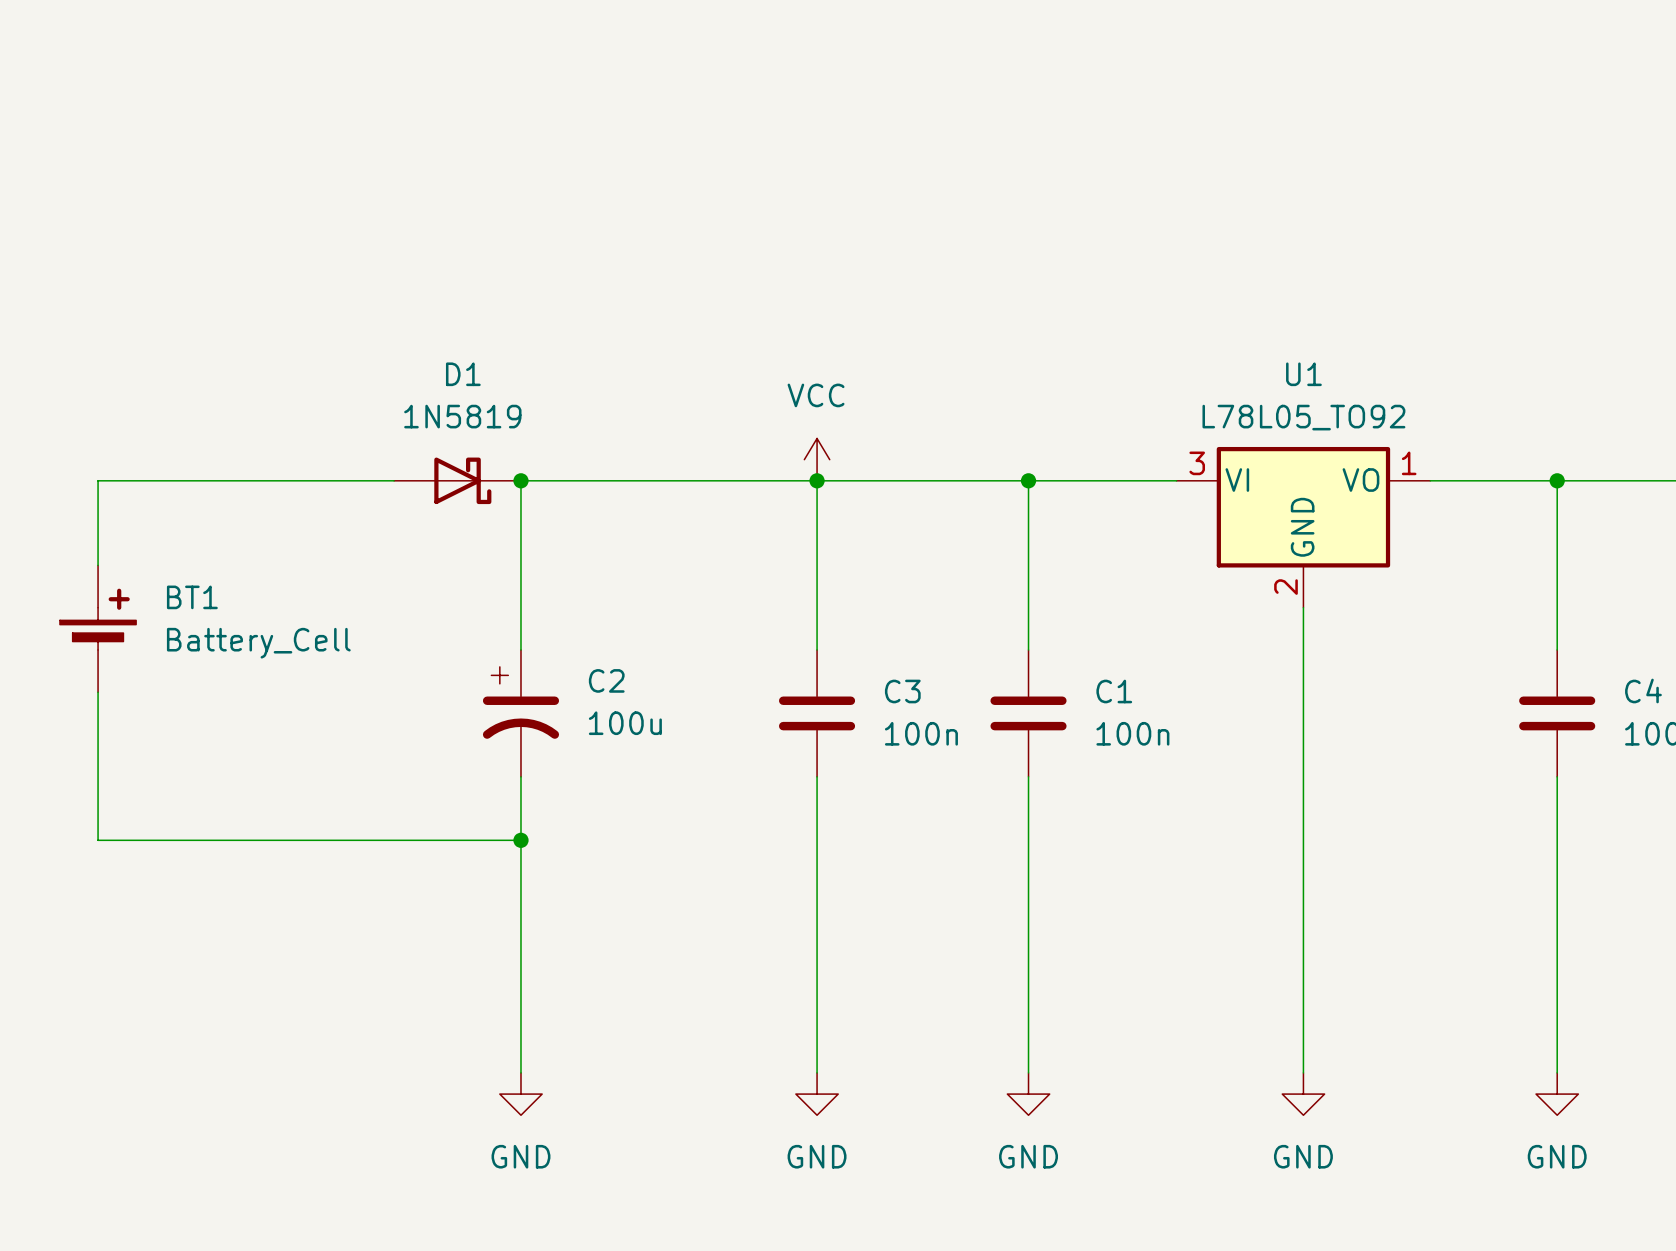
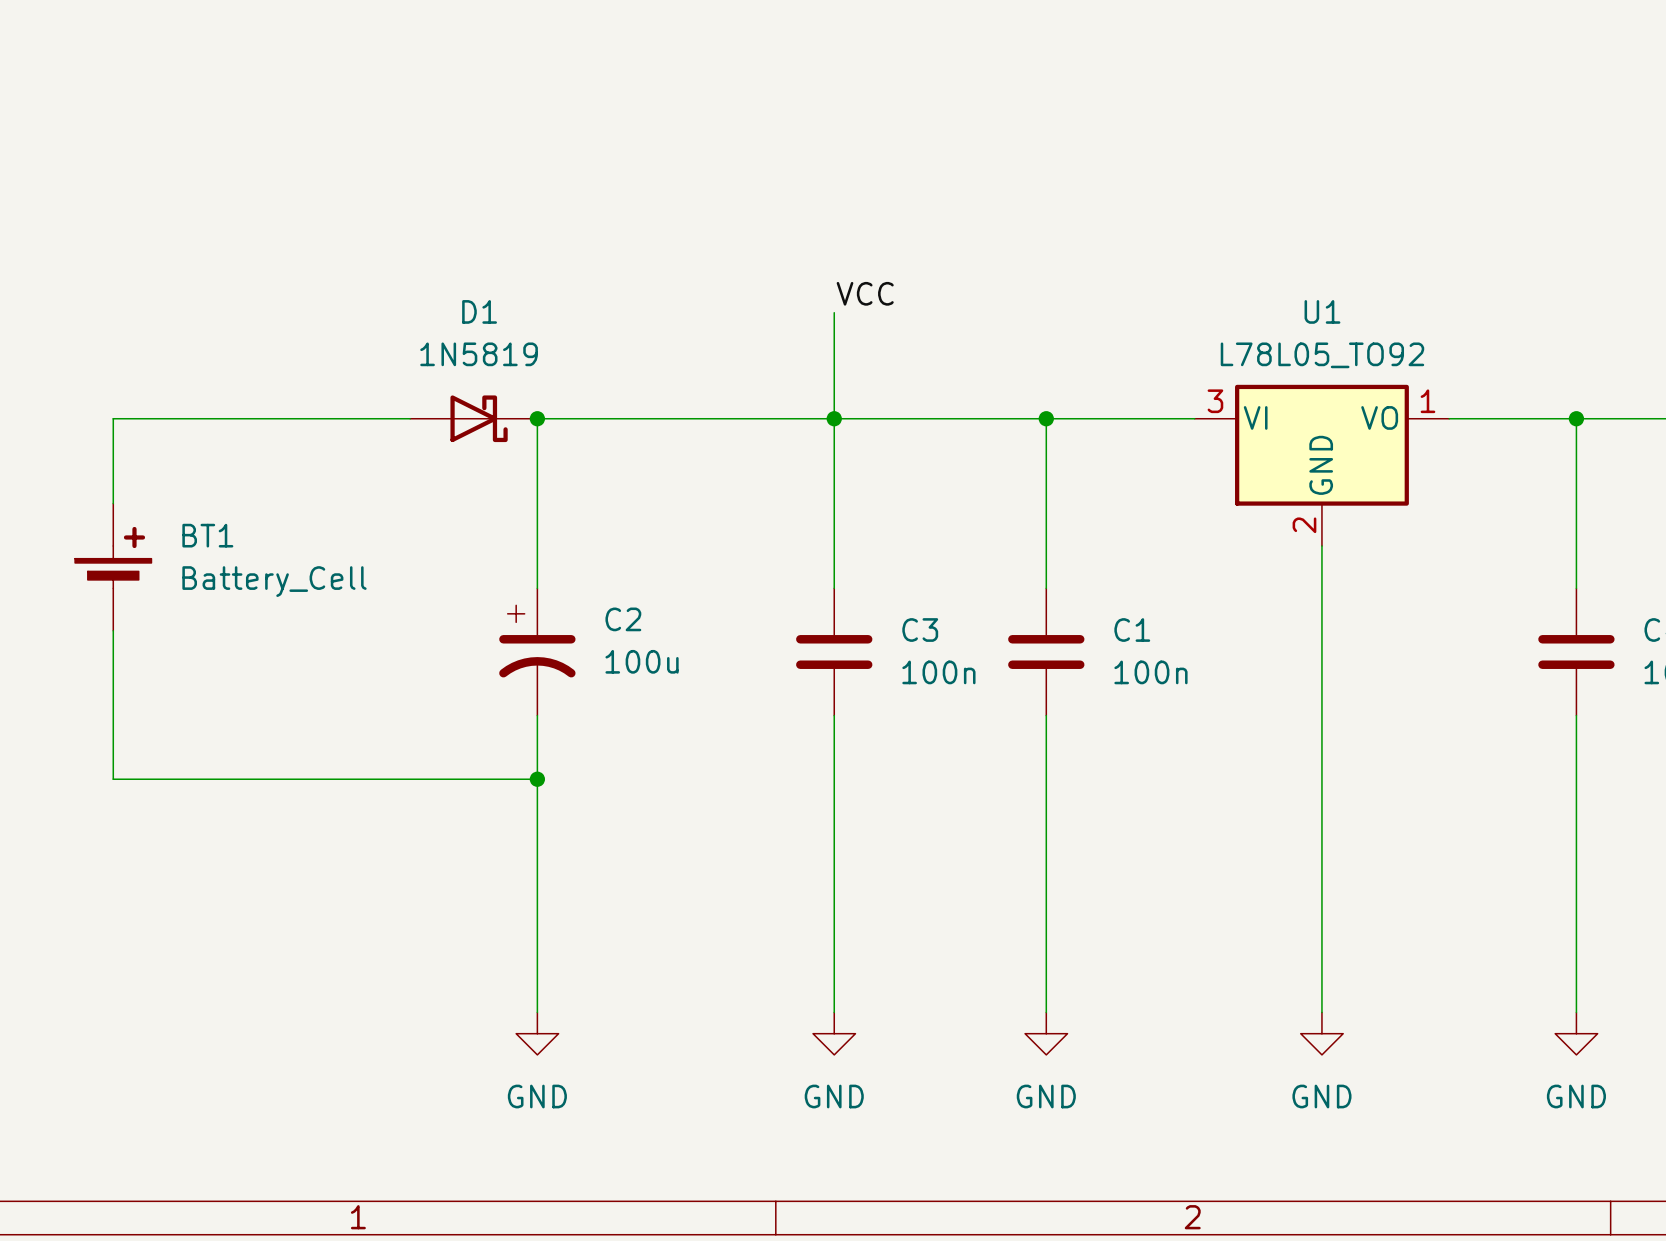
label: none -> VCC (865, 293)
wire: none -> (834, 312) (834, 418)
power symbol: VCC (817, 459) -> none

